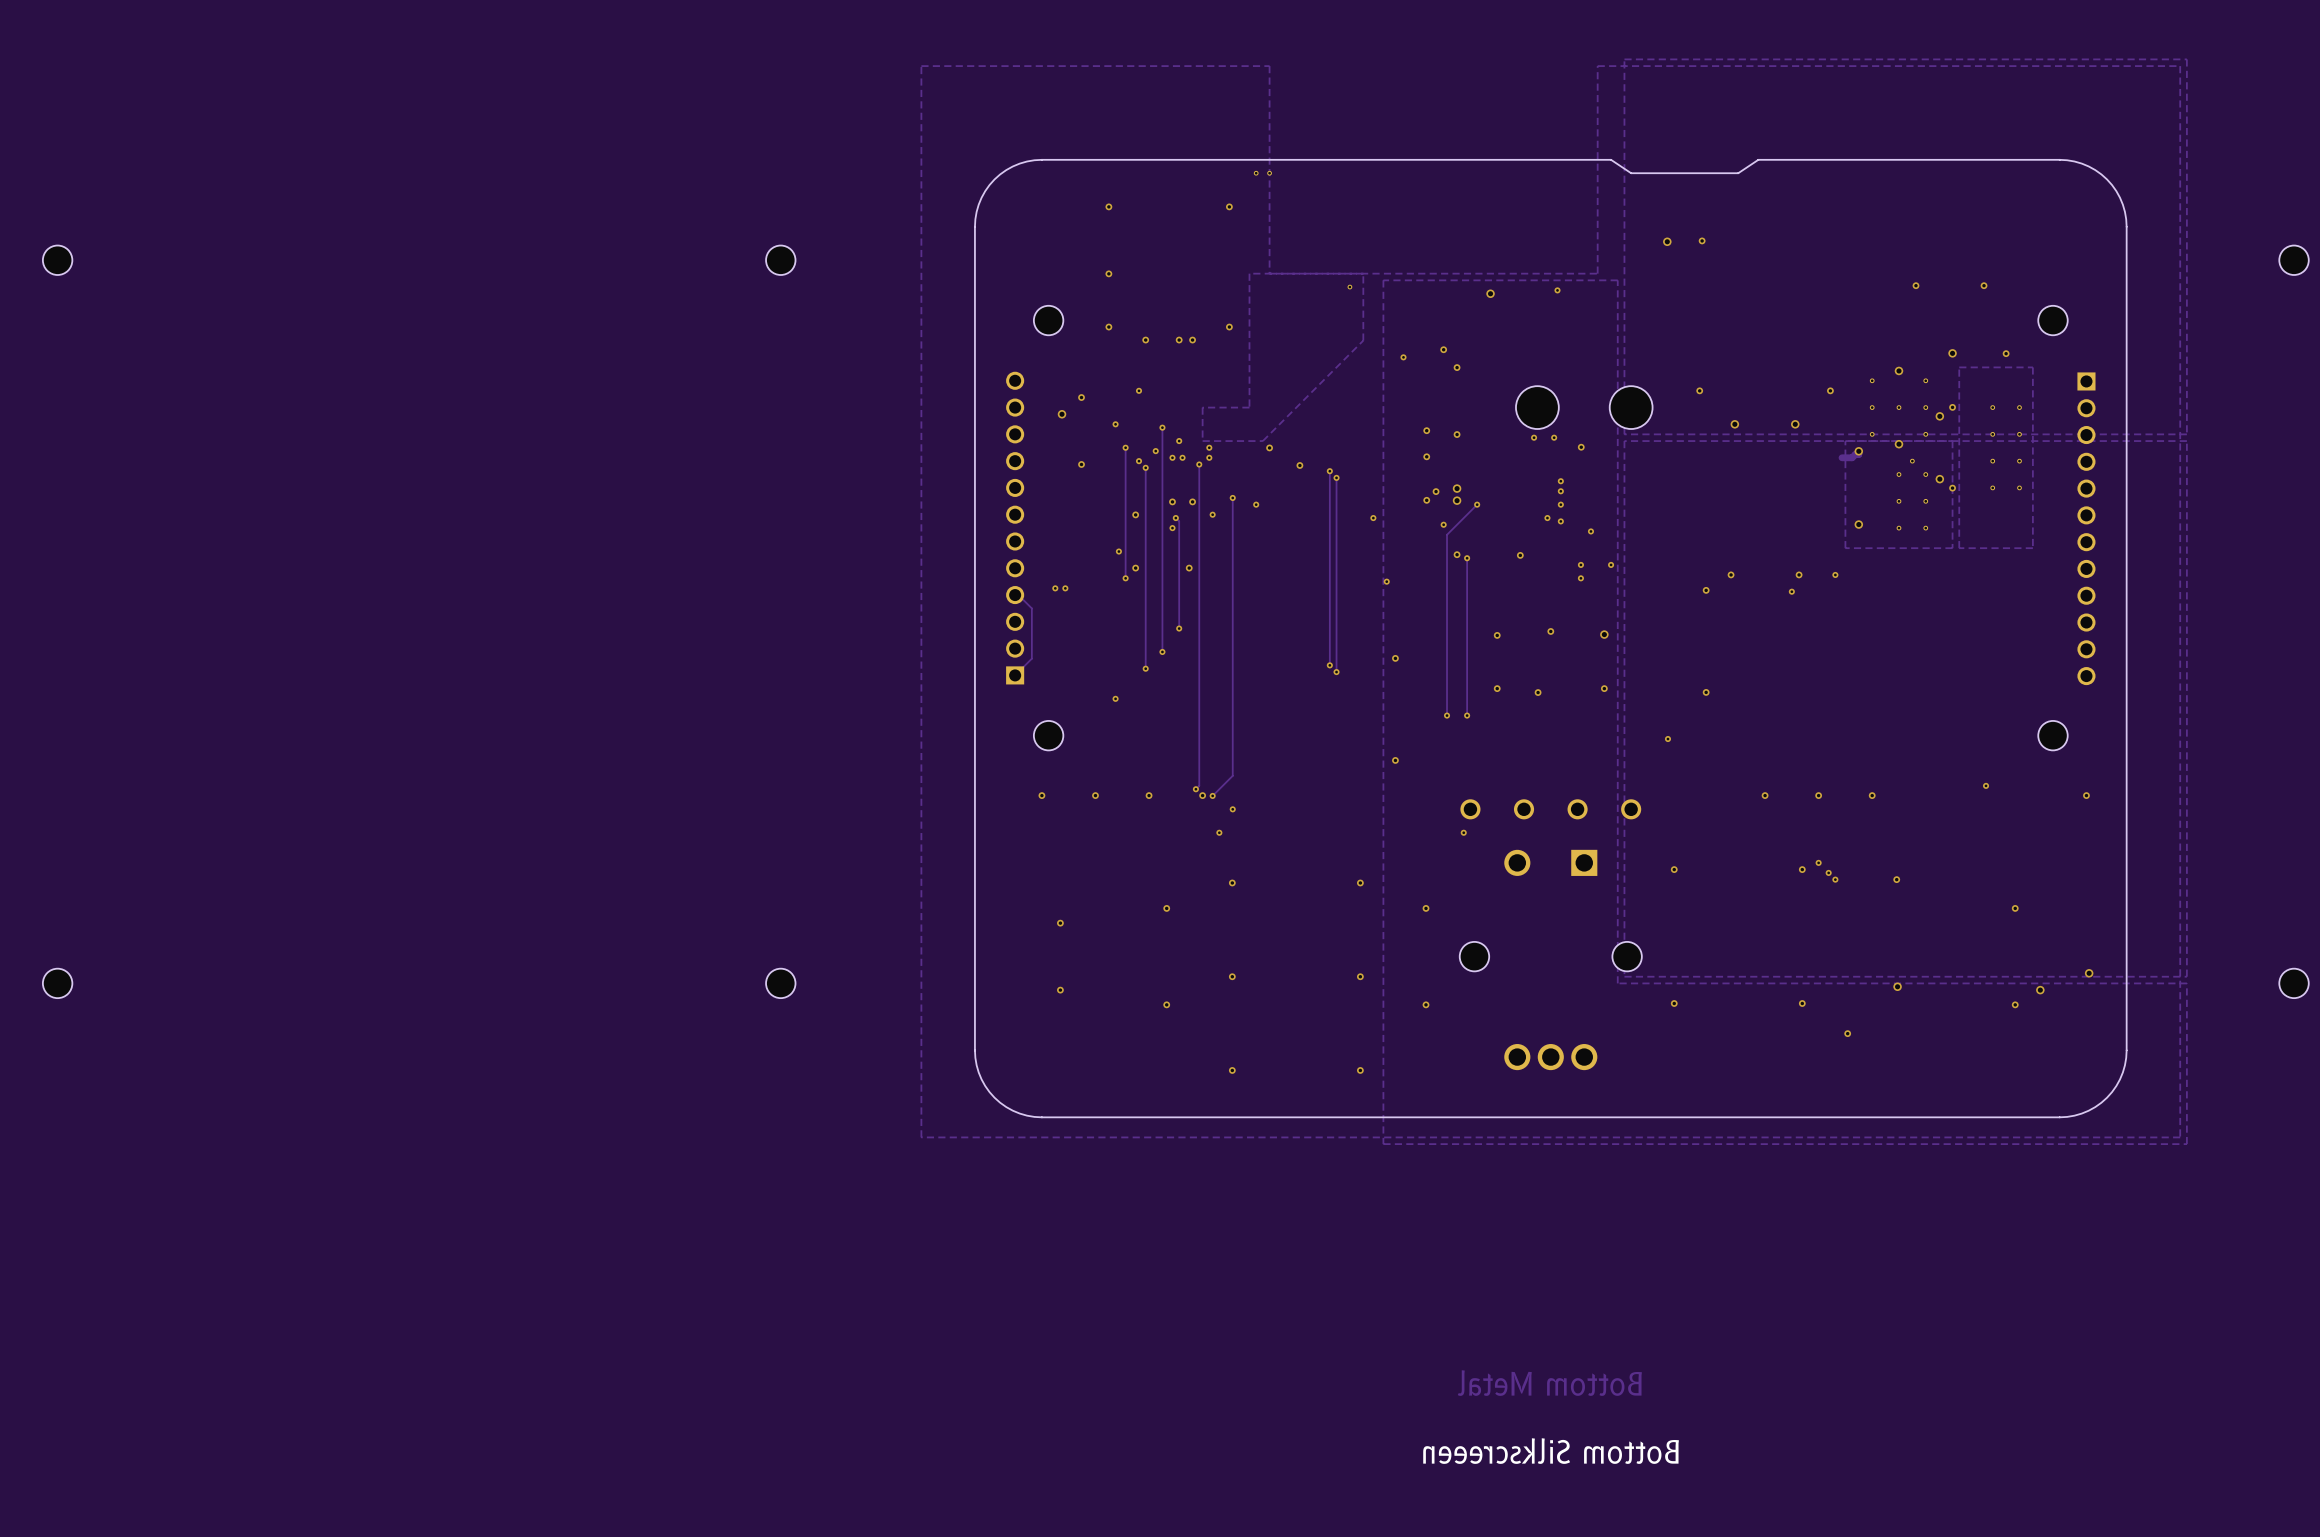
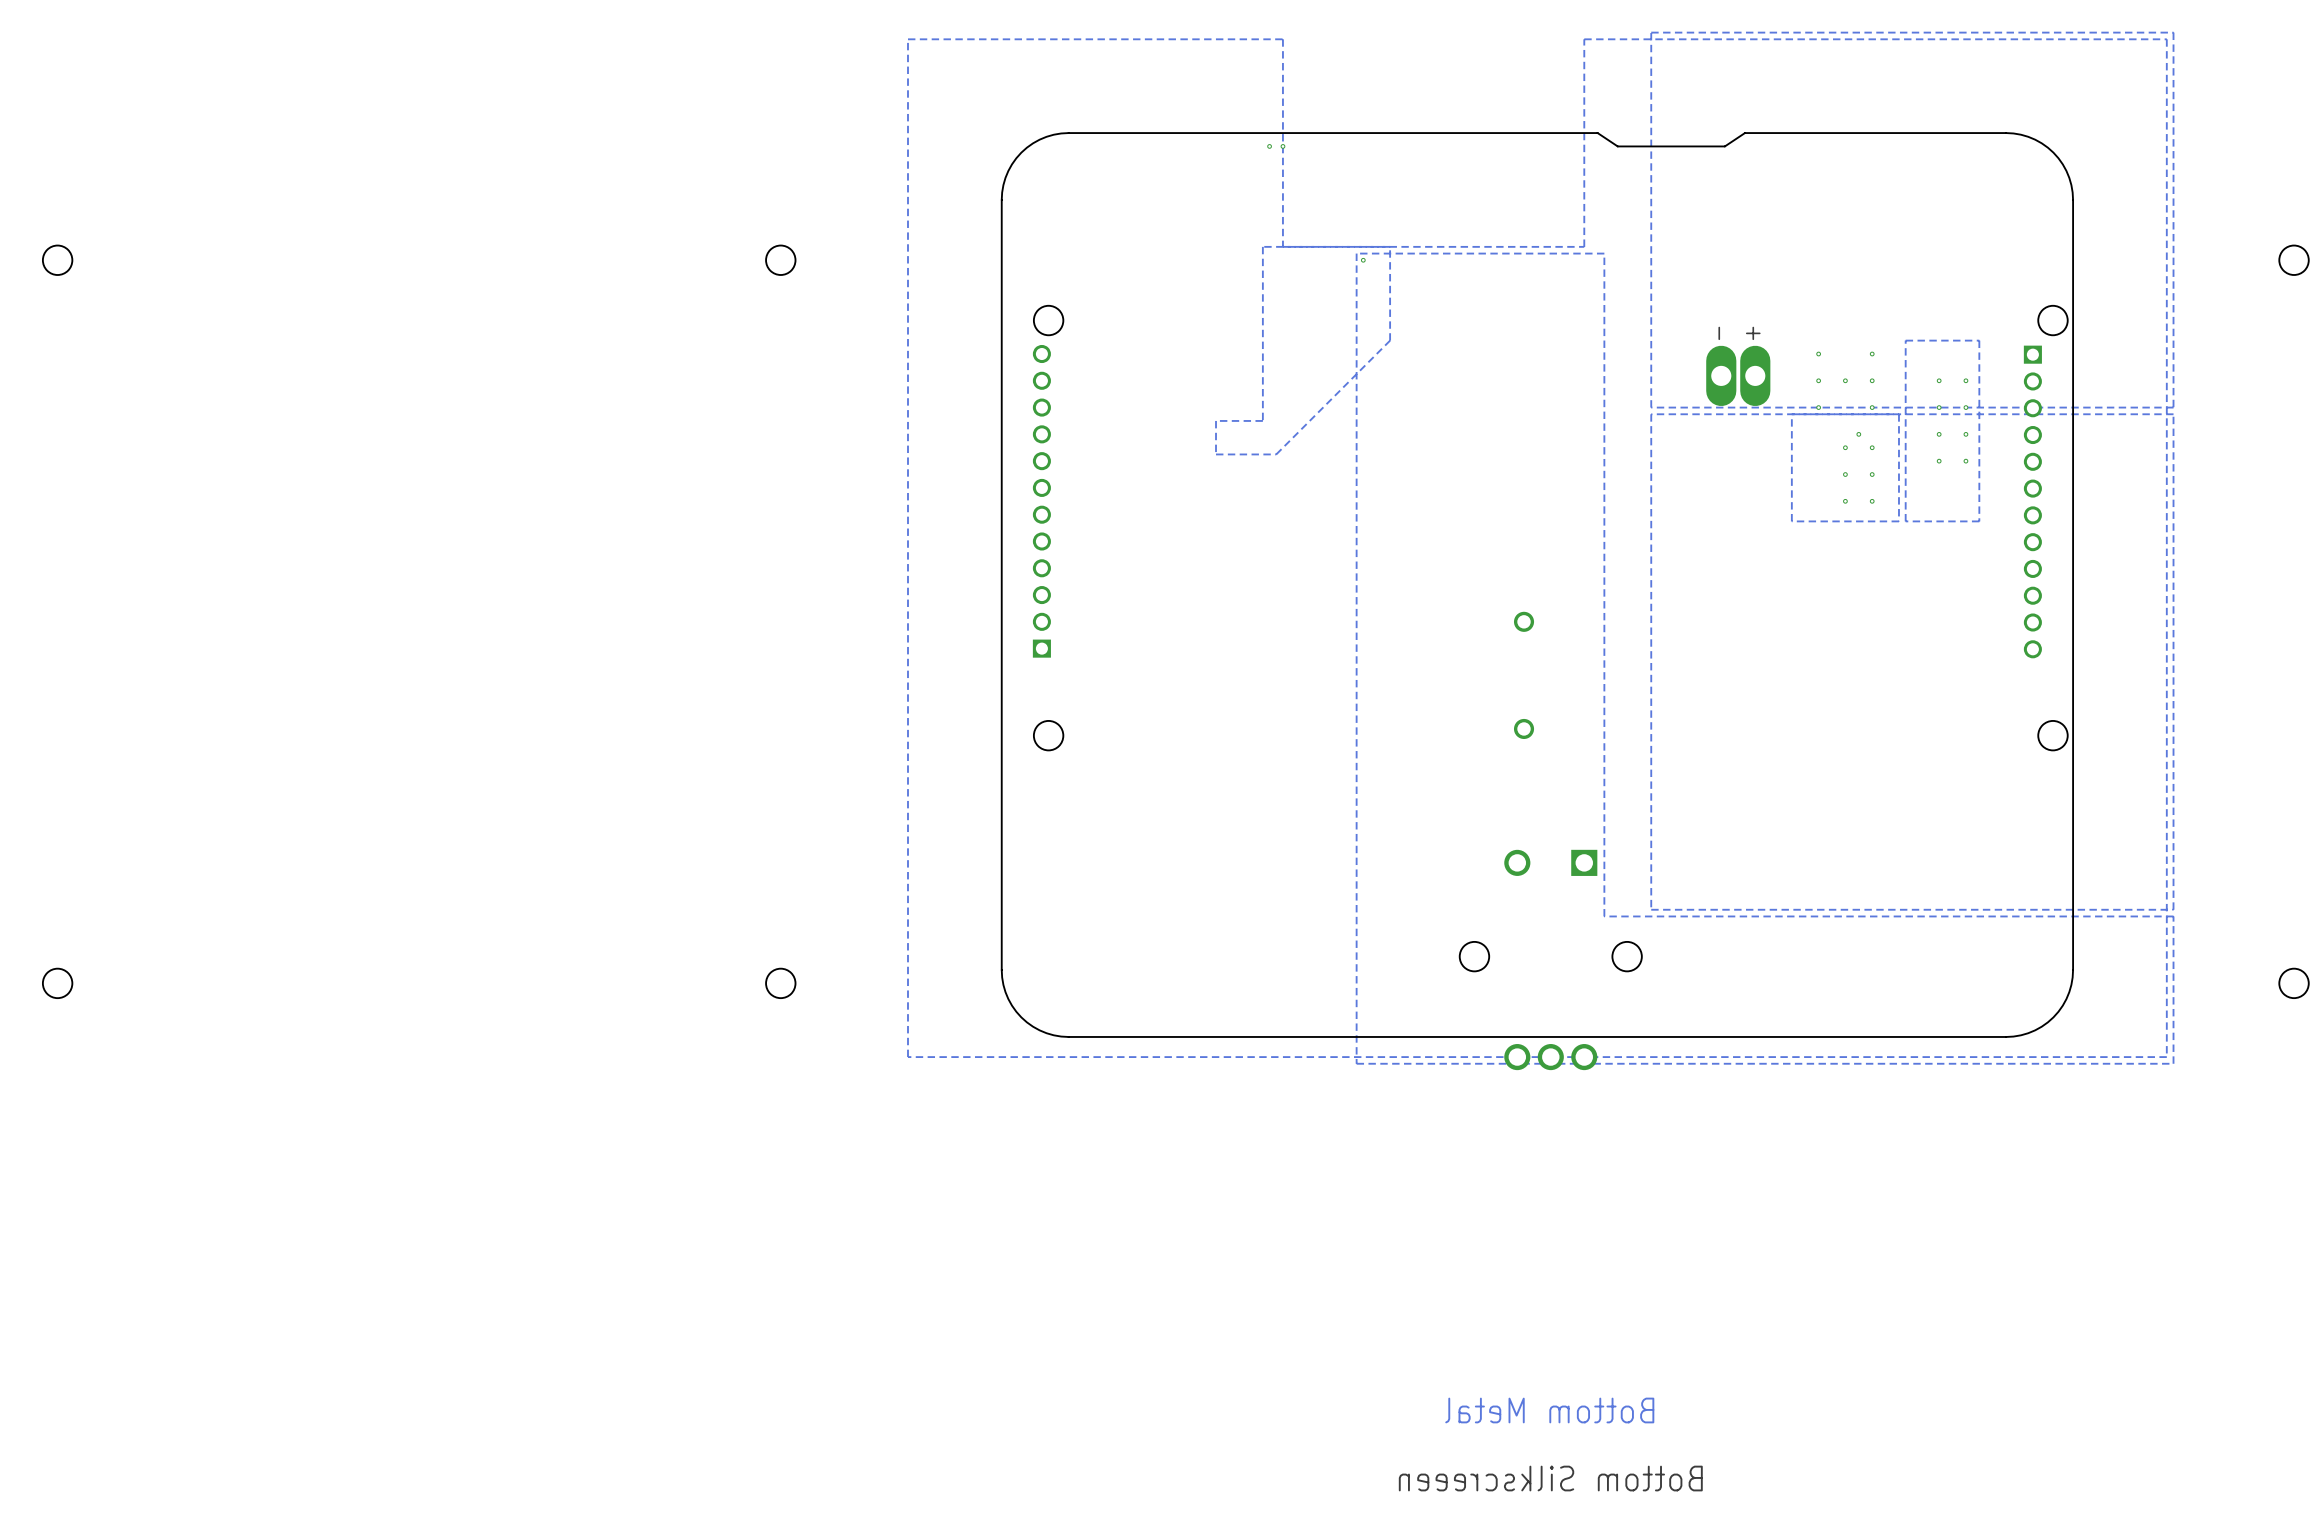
zone outline: (2186, 59) (2186, 434) (1624, 434) (1624, 59) (2186, 59) -> (2173, 32) (2173, 407) (1651, 407) (1651, 32) (2173, 32)
board edge: (2059, 159) (1758, 159) (1738, 173) (1631, 173) (1611, 159) (1041, 159) (1019, 163) (1000, 174) (989, 185) (981, 197) (976, 211) (974, 226) (974, 1050) (978, 1072) (989, 1092) (1000, 1102) (1012, 1110) (1027, 1115) (1041, 1117) (2059, 1117) (2081, 1113) (2101, 1102) (2112, 1092) (2120, 1079) (2124, 1065) (2126, 1050) (2126, 226) (2122, 204) (2116, 191) (2107, 179) (2095, 170) (2081, 163) (2059, 159) -> (2006, 133) (2028, 136) (2041, 143) (2053, 152) (2062, 164) (2069, 177) (2073, 200) (2073, 970) (2071, 984) (2066, 999) (2058, 1011) (2047, 1022) (2028, 1033) (2006, 1036) (1068, 1036) (1053, 1035) (1039, 1030) (1026, 1022) (1016, 1011) (1005, 992) (1001, 970) (1001, 200) (1003, 185) (1008, 170) (1016, 158) (1026, 147) (1046, 136) (1068, 133) (1597, 133) (1617, 146) (1724, 146) (1744, 133) (2006, 133)
part position: (1262, 173) -> (1276, 146)
via: (1108, 206) -> none
via: (1229, 206) -> none
via: (1702, 240) -> none
via: (1667, 241) -> none
zone outline: none -> (1390, 246) (1390, 340) (1276, 454) (1216, 454) (1216, 420) (1262, 420) (1262, 246) (1584, 246) (1584, 39) (2166, 39) (2166, 1057) (908, 1057) (908, 39) (1282, 39) (1282, 246)
via: (1108, 273) -> none
zone outline: (1363, 273) (1363, 340) (1262, 441) (1202, 441) (1202, 407) (1249, 407) (1249, 273) (1597, 273) (1597, 66) (2180, 66) (2180, 1137) (921, 1137) (921, 66) (1269, 66) (1269, 273) -> none
zone outline: (1617, 280) (1617, 983) (2186, 983) (2186, 1144) (1383, 1144) (1383, 280) (1617, 280) -> (1604, 253) (1604, 916) (2173, 916) (2173, 1063) (1356, 1063) (1356, 253) (1604, 253)
via: (1915, 285) -> none
via: (1984, 285) -> none
part position: (1349, 287) -> (1363, 260)
via: (1557, 290) -> none
via: (1490, 293) -> none
via: (1108, 327) -> none
via: (1229, 327) -> none
via: (1145, 340) -> none
via: (1179, 340) -> none
via: (1192, 340) -> none
via: (1443, 349) -> none
via: (1952, 353) -> none
via: (2006, 353) -> none
part: none -> (1818, 354)
part: none -> (1872, 354)
via: (1403, 357) -> none
via: (1457, 367) -> none
zone outline: (2032, 367) (1959, 367) (1959, 548) (2032, 548) (2032, 367) -> (1979, 340) (1905, 340) (1905, 521) (1979, 521) (1979, 340)
via: (1898, 370) -> none
part: none -> (1738, 375)
part: none -> (1818, 380)
part: none -> (1845, 380)
part position: (1925, 380) -> (1939, 380)
part: none -> (1965, 380)
via: (1139, 390) -> none
via: (1699, 390) -> none
via: (1830, 390) -> none
via: (1081, 397) -> none
hole: (1537, 407) -> none
hole: (1631, 407) -> none
part: none -> (1818, 407)
part: (1898, 407) -> none
part position: (1925, 407) -> (1939, 407)
via: (1952, 407) -> none
part: none -> (1965, 407)
part: (1992, 407) -> none
part: (2019, 407) -> none
via: (1062, 414) -> none
via: (1939, 416) -> none
via: (1115, 424) -> none
via: (1734, 424) -> none
via: (1795, 424) -> none
track: (1162, 427) (1162, 651) -> none
via: (1162, 427) -> none
via: (1426, 430) -> none
via: (1457, 434) -> none
part: none -> (1858, 434)
part: (1872, 434) -> none
part position: (1925, 434) -> (1939, 434)
part: none -> (1965, 434)
part: (1992, 434) -> none
part: (2019, 434) -> none
via: (1534, 437) -> none
via: (1554, 437) -> none
via: (1179, 441) -> none
zone outline: (1952, 441) (1952, 548) (1845, 548) (1845, 441) -> (1898, 414) (1898, 521) (1791, 521) (1791, 414)
zone outline: (2186, 441) (1624, 441) (1624, 976) (2186, 976) (2186, 441) -> (2173, 414) (2173, 909) (1651, 909) (1651, 414) (2173, 414)
via: (1898, 444) -> none
track: (1125, 447) (1125, 578) -> none
via: (1125, 447) -> none
via: (1209, 447) -> none
via: (1269, 447) -> none
via: (1581, 447) -> none
part: none -> (1845, 447)
part: none -> (1872, 447)
via: (1155, 451) -> none
track: (1858, 451) (1858, 454) (1852, 457) (1842, 457) -> none
via: (1858, 451) -> none
via: (1426, 456) -> none
via: (1172, 457) -> none
via: (1182, 457) -> none
via: (1209, 457) -> none
via: (1139, 461) -> none
part: (1912, 461) -> none
part: none -> (1939, 461)
part: none -> (1965, 461)
part: (1992, 461) -> none
part: (2019, 461) -> none
via: (1081, 464) -> none
track: (1199, 464) (1199, 785) (1195, 789) -> none
via: (1199, 464) -> none
via: (1299, 465) -> none
track: (1145, 467) (1145, 668) -> none
via: (1145, 467) -> none
track: (1329, 471) (1329, 665) -> none
via: (1329, 471) -> none
part: none -> (1845, 474)
part: none -> (1872, 474)
part: (1898, 474) -> none
part: (1925, 474) -> none
track: (1336, 477) (1336, 672) -> none
via: (1336, 477) -> none
via: (1939, 479) -> none
via: (1560, 481) -> none
part: (1992, 487) -> none
part: (2019, 487) -> none
via: (1457, 488) -> none
via: (1952, 488) -> none
via: (1436, 491) -> none
via: (1560, 491) -> none
track: (1232, 497) (1232, 775) (1212, 795) -> none
via: (1232, 497) -> none
via: (1426, 500) -> none
via: (1457, 500) -> none
via: (1172, 501) -> none
via: (1192, 501) -> none
part: none -> (1845, 501)
part: none -> (1872, 501)
part: (1898, 501) -> none
part: (1925, 501) -> none
via: (1256, 504) -> none
track: (1477, 504) (1447, 534) (1447, 715) -> none
via: (1477, 504) -> none
via: (1560, 504) -> none
via: (1135, 514) -> none
via: (1212, 514) -> none
track: (1175, 518) (1179, 521) (1179, 628) -> none
via: (1175, 518) -> none
via: (1373, 518) -> none
via: (1547, 518) -> none
via: (1560, 521) -> none
via: (1443, 524) -> none
via: (1858, 524) -> none
part position: (1015, 528) -> (1041, 501)
via: (1172, 528) -> none
part: (1898, 528) -> none
part: (1925, 528) -> none
part position: (2086, 528) -> (2032, 501)
via: (1590, 531) -> none
via: (1118, 551) -> none
via: (1457, 554) -> none
via: (1520, 555) -> none
track: (1467, 558) (1467, 715) -> none
via: (1467, 558) -> none
via: (1580, 564) -> none
via: (1611, 564) -> none
via: (1135, 568) -> none
via: (1189, 568) -> none
via: (1731, 574) -> none
via: (1799, 574) -> none
via: (1835, 574) -> none
via: (1125, 578) -> none
via: (1580, 578) -> none
via: (1386, 581) -> none
via: (1055, 588) -> none
via: (1065, 588) -> none
via: (1706, 590) -> none
via: (1791, 591) -> none
track: (1015, 595) (1018, 595) (1031, 608) (1031, 658) (1015, 675) -> none
part: none -> (1524, 621)
via: (1179, 628) -> none
via: (1550, 631) -> none
via: (1604, 634) -> none
via: (1497, 635) -> none
via: (1162, 651) -> none
via: (1395, 658) -> none
via: (1329, 665) -> none
via: (1145, 668) -> none
via: (1336, 672) -> none
via: (1497, 688) -> none
via: (1604, 688) -> none
via: (1538, 692) -> none
via: (1706, 692) -> none
via: (1115, 698) -> none
via: (1447, 715) -> none
via: (1467, 715) -> none
part: none -> (1524, 728)
via: (1667, 739) -> none
via: (1395, 760) -> none
via: (1986, 785) -> none
via: (1195, 789) -> none
via: (1041, 795) -> none
via: (1095, 795) -> none
via: (1149, 795) -> none
via: (1202, 795) -> none
via: (1212, 795) -> none
via: (1765, 795) -> none
via: (1818, 795) -> none
via: (1872, 795) -> none
via: (2086, 795) -> none
via: (1232, 809) -> none
part: (1470, 809) -> none
part: (1524, 809) -> none
part: (1577, 809) -> none
part: (1631, 809) -> none
via: (1219, 832) -> none
via: (1463, 832) -> none
via: (1818, 862) -> none
via: (1674, 869) -> none
via: (1802, 869) -> none
via: (1828, 872) -> none
via: (1835, 879) -> none
via: (1896, 879) -> none
via: (1232, 882) -> none
via: (1360, 882) -> none
via: (1166, 908) -> none
via: (1426, 908) -> none
via: (2015, 908) -> none
via: (1060, 923) -> none
via: (2089, 973) -> none
via: (1232, 976) -> none
via: (1360, 976) -> none
via: (1897, 986) -> none
via: (1060, 990) -> none
via: (2040, 990) -> none
via: (1674, 1003) -> none
via: (1802, 1003) -> none
via: (1166, 1004) -> none
via: (1426, 1004) -> none
via: (2015, 1004) -> none
via: (1847, 1033) -> none
via: (1232, 1070) -> none
via: (1360, 1070) -> none
drawing position: (1551, 1417) -> (1550, 1444)

